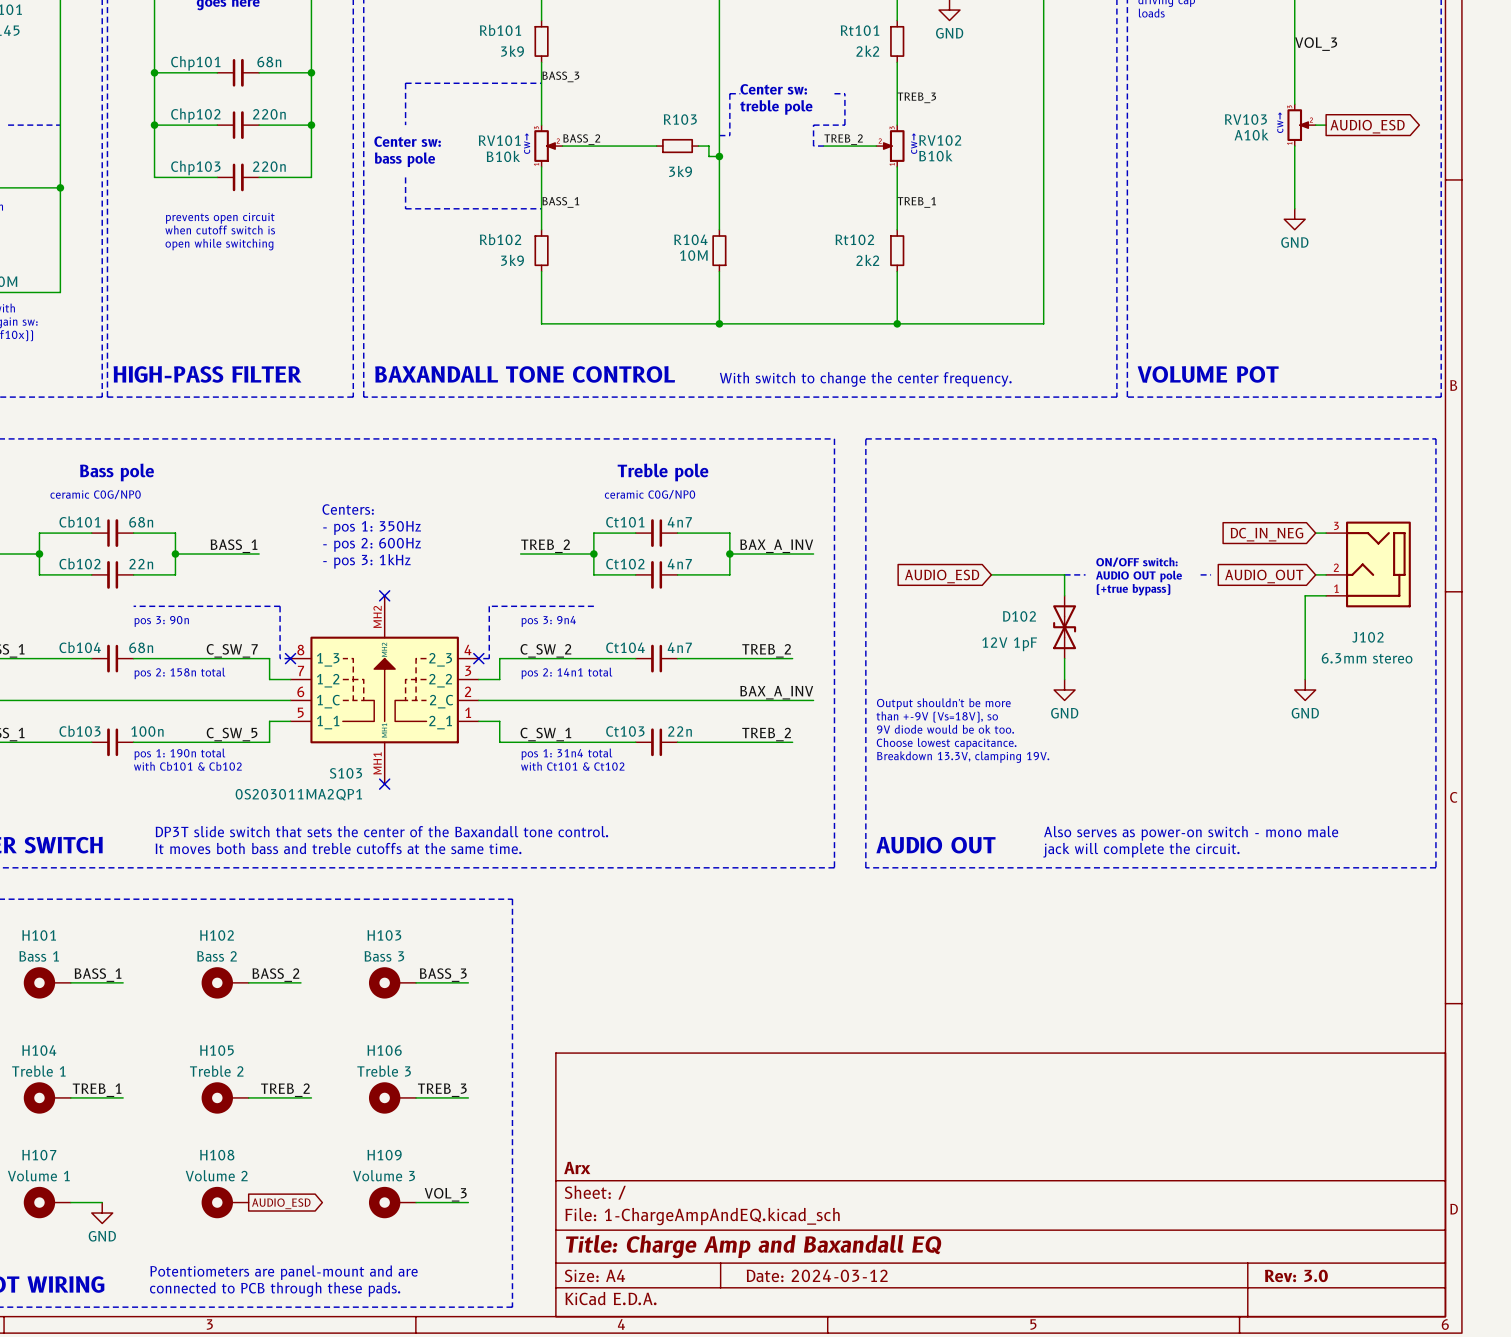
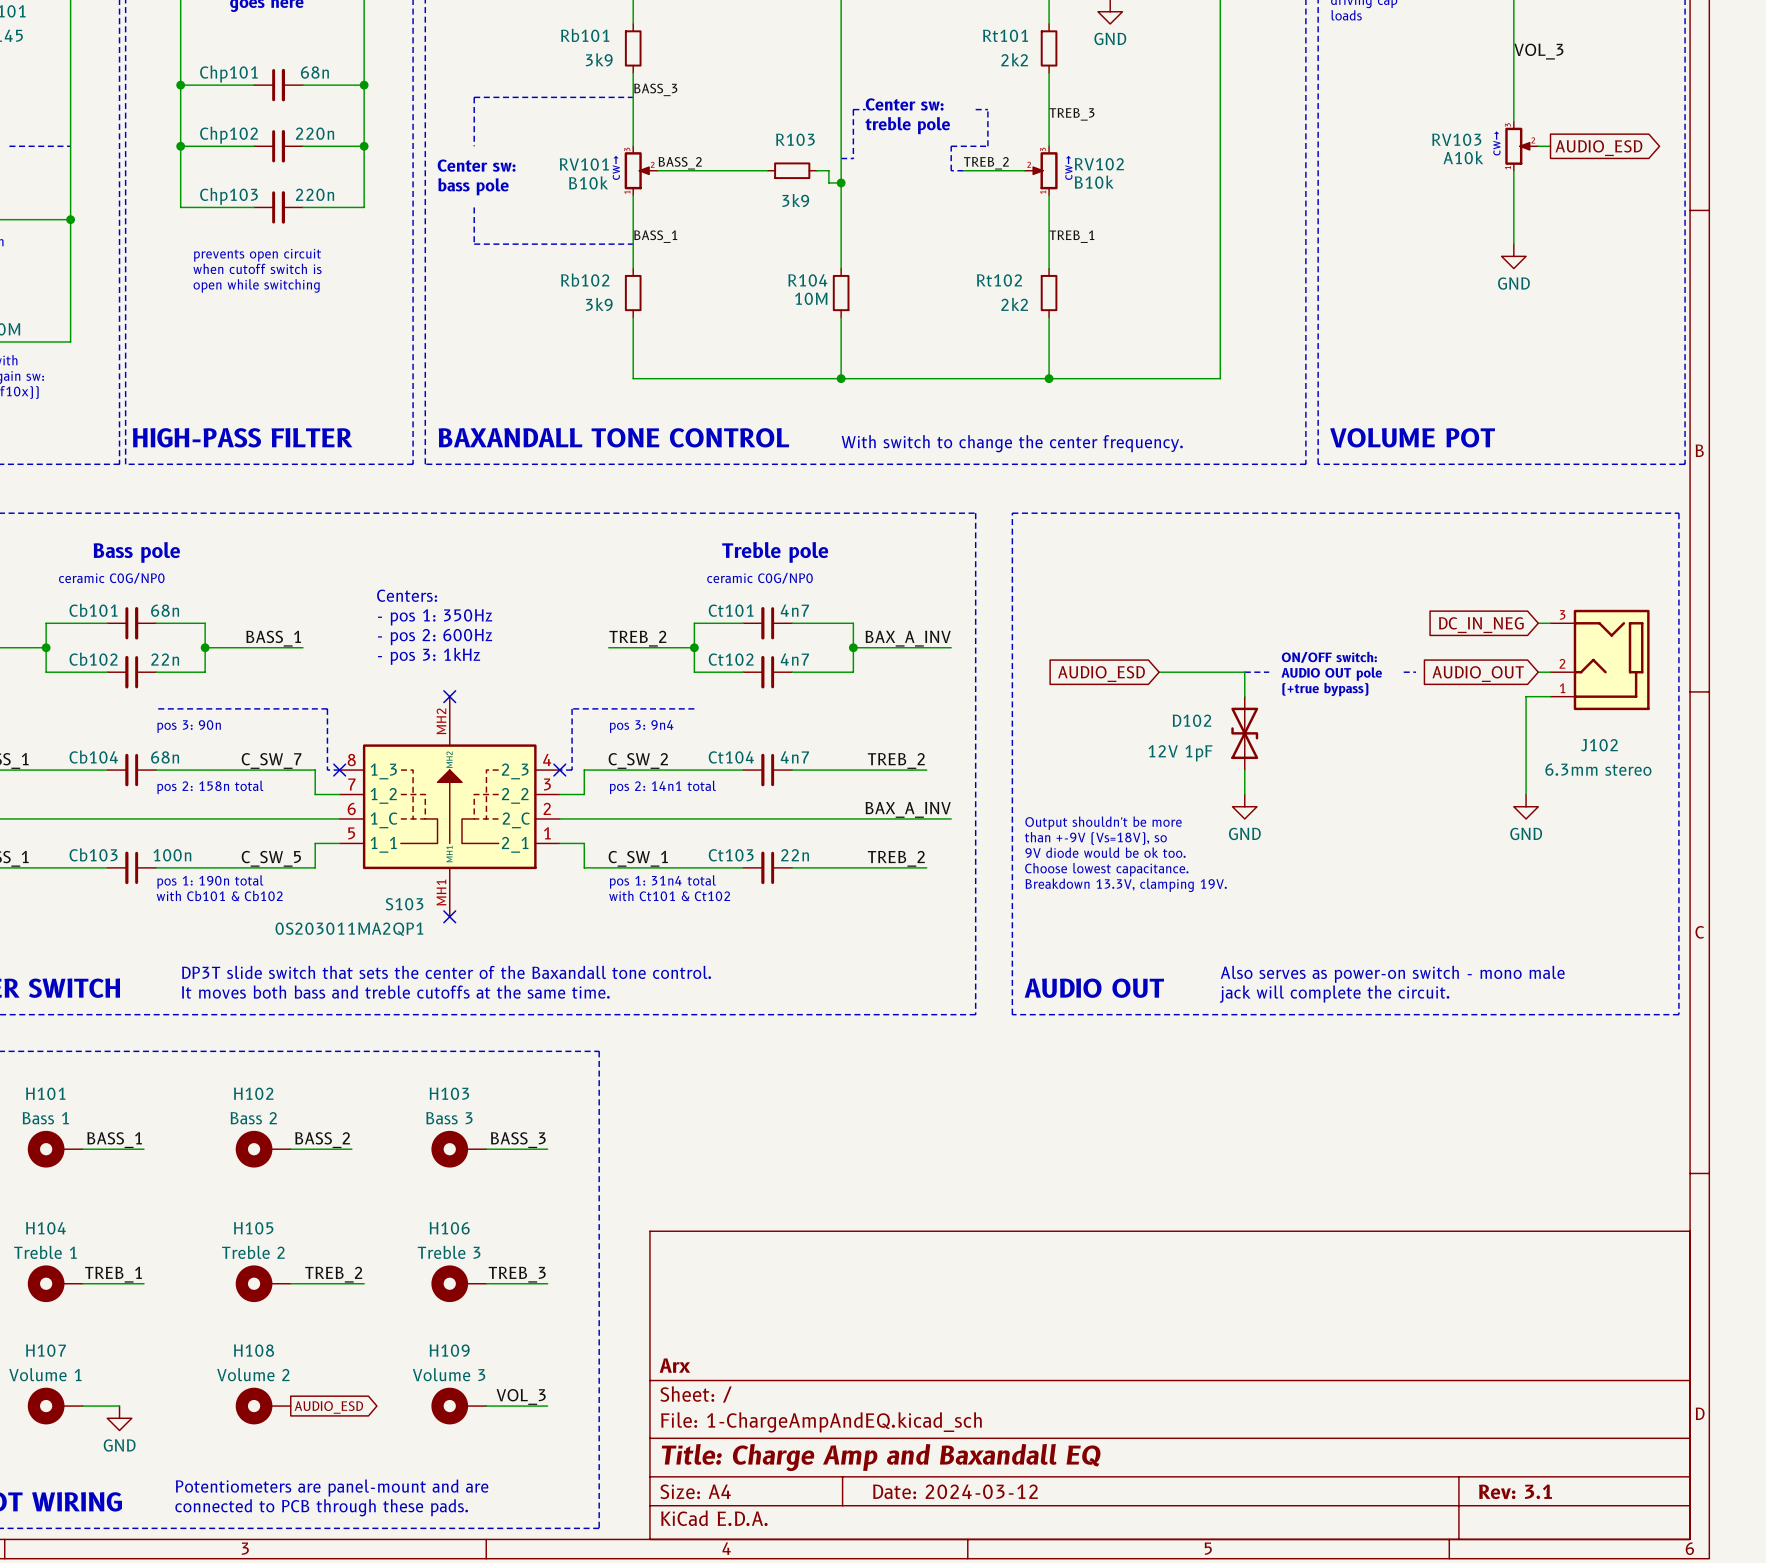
title block: Rev: 3.0 (1296, 1275) -> Rev: 3.1 (1515, 1491)

